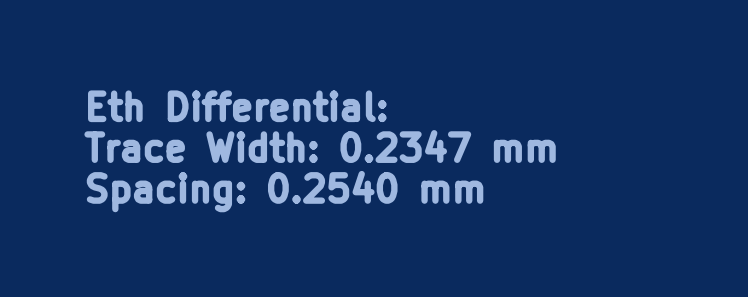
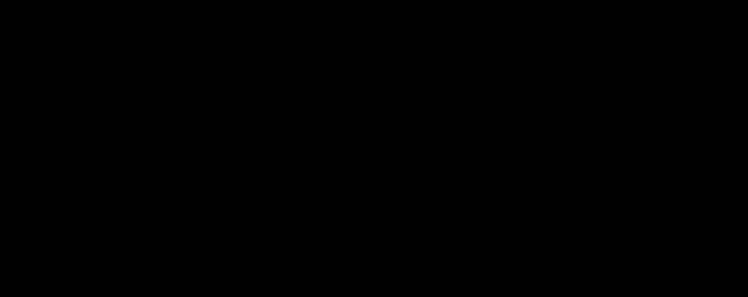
text: Eth Differential: (237, 106) -> none
text: Trace Width: 0.2347 mm (320, 146) -> none
text: Spacing: 0.2540 mm (285, 191) -> none

